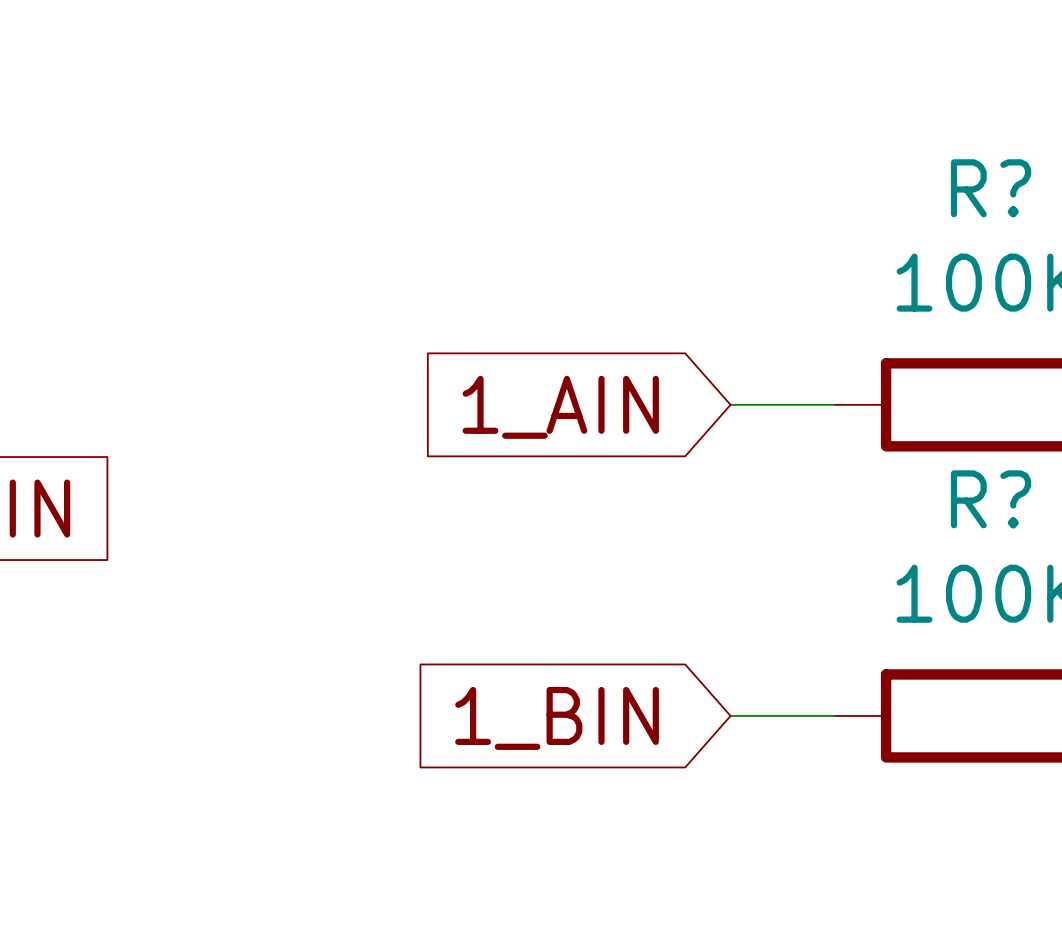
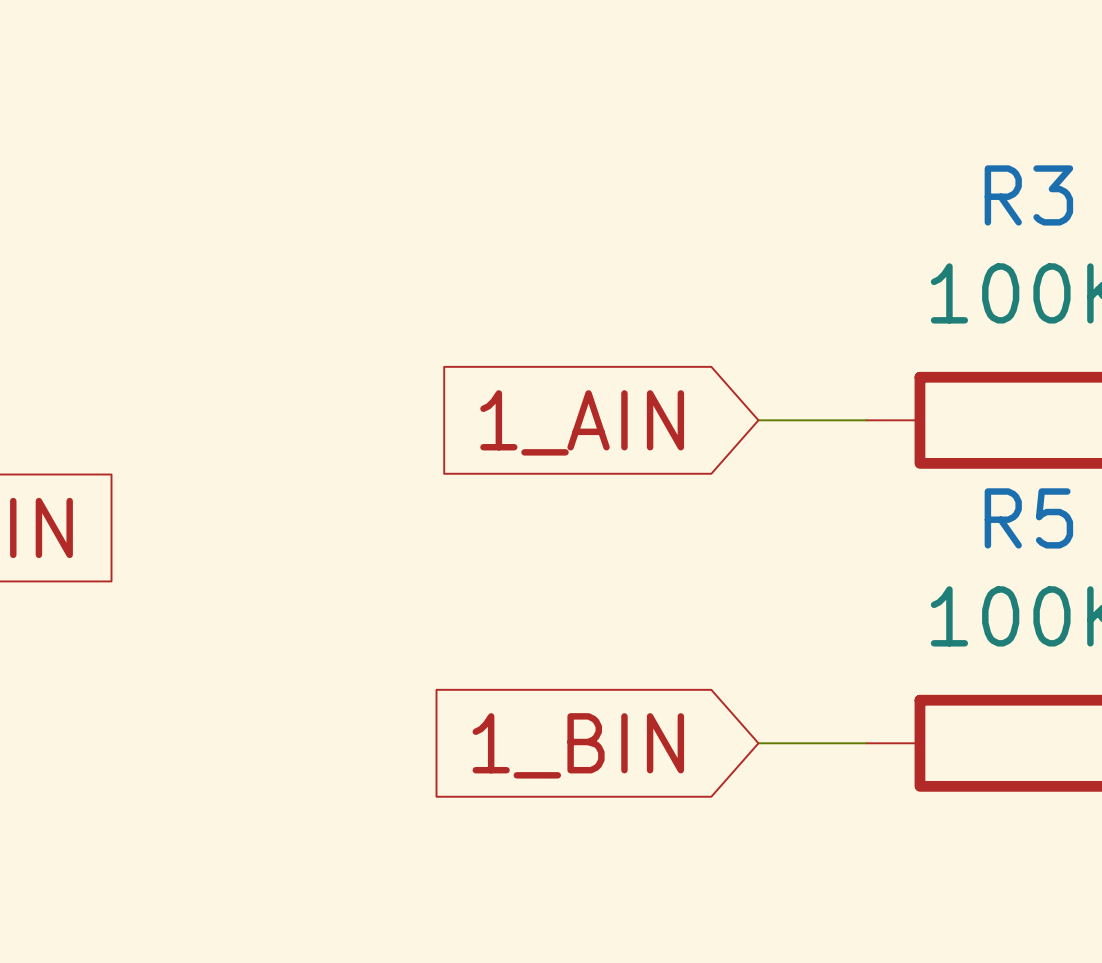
R? name: R? (991, 188) -> R3 (1028, 195)
R? name: R? (991, 499) -> R5 (1028, 518)

